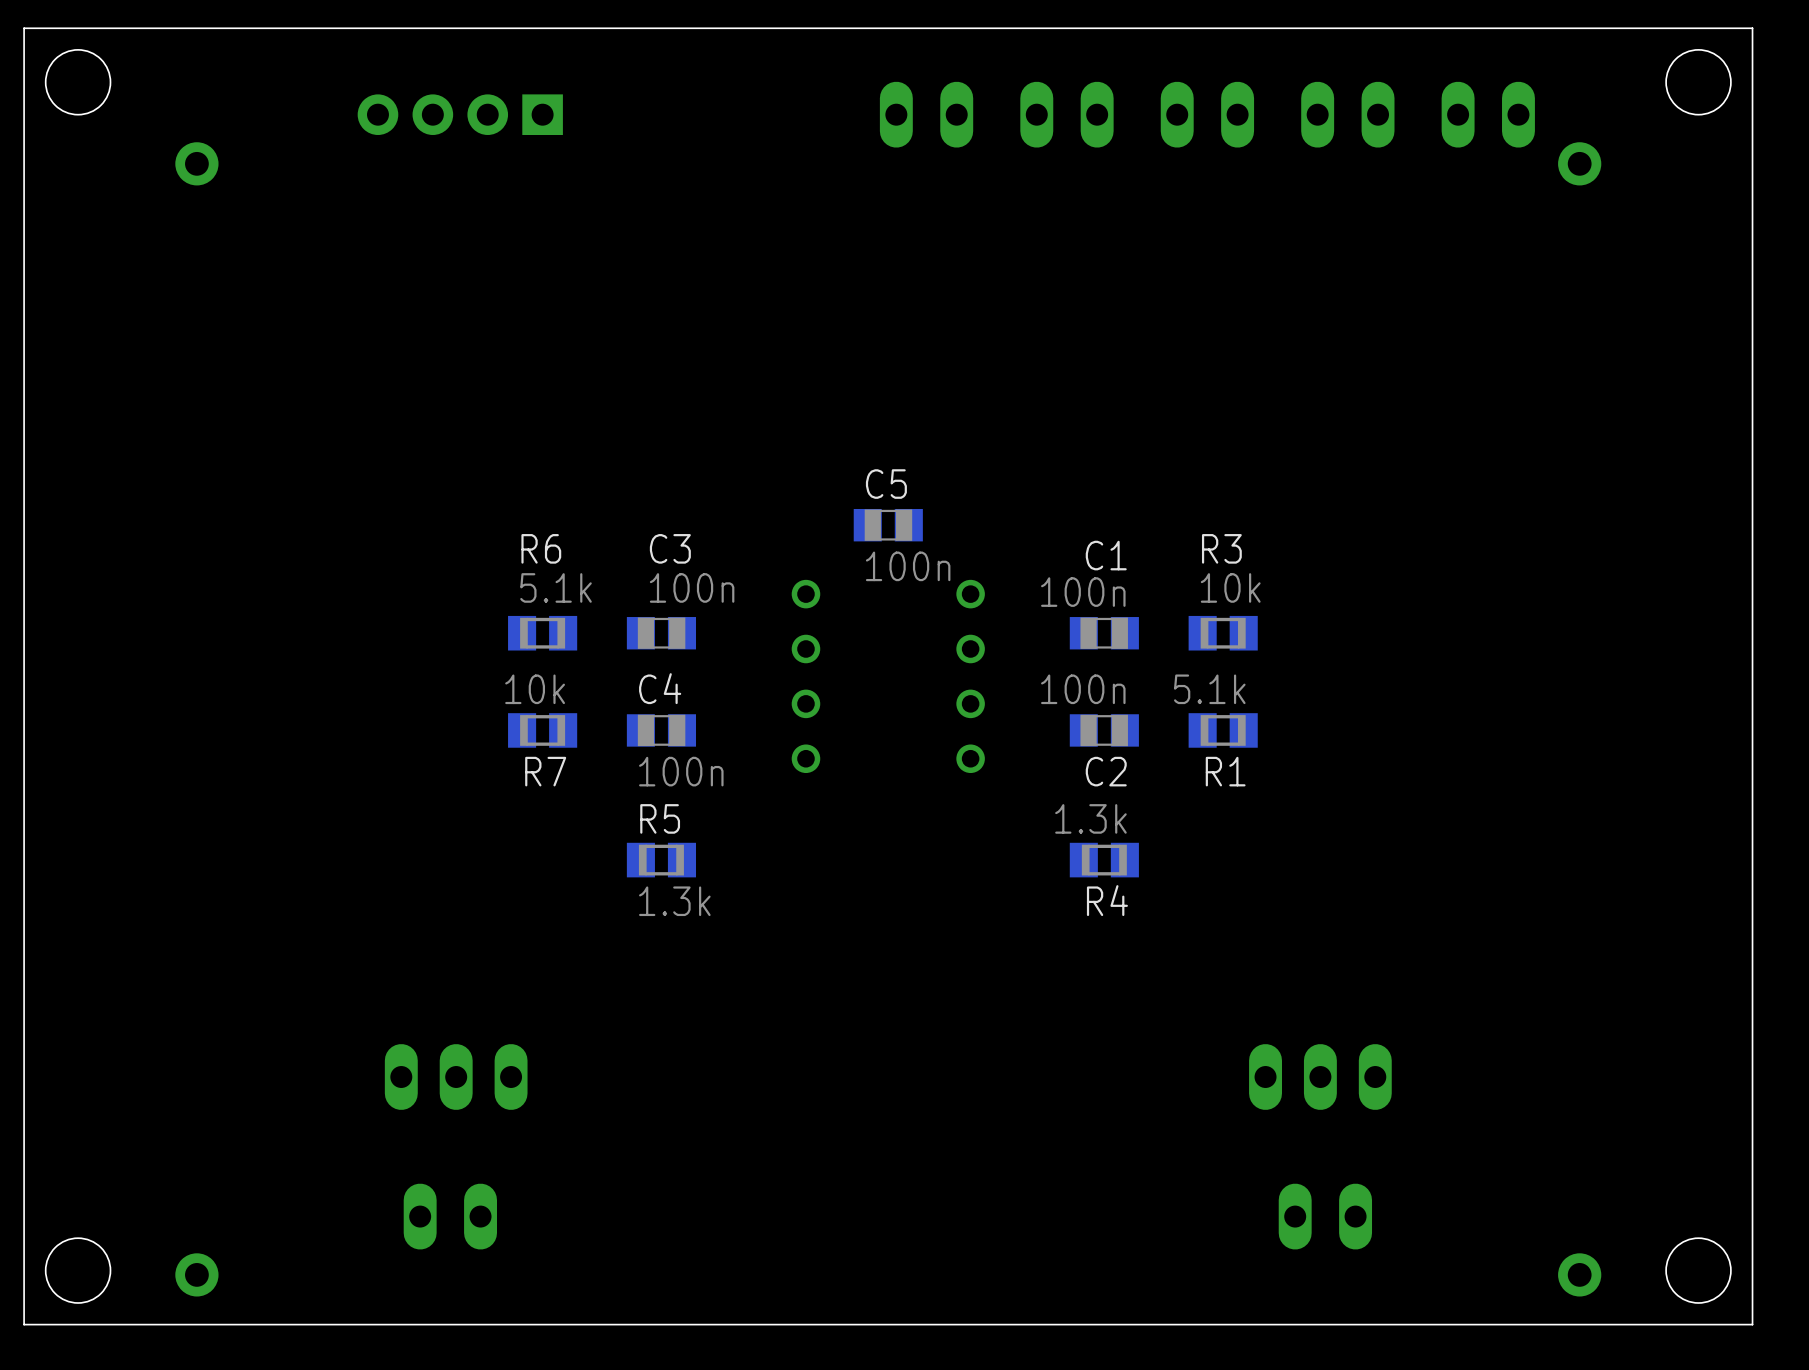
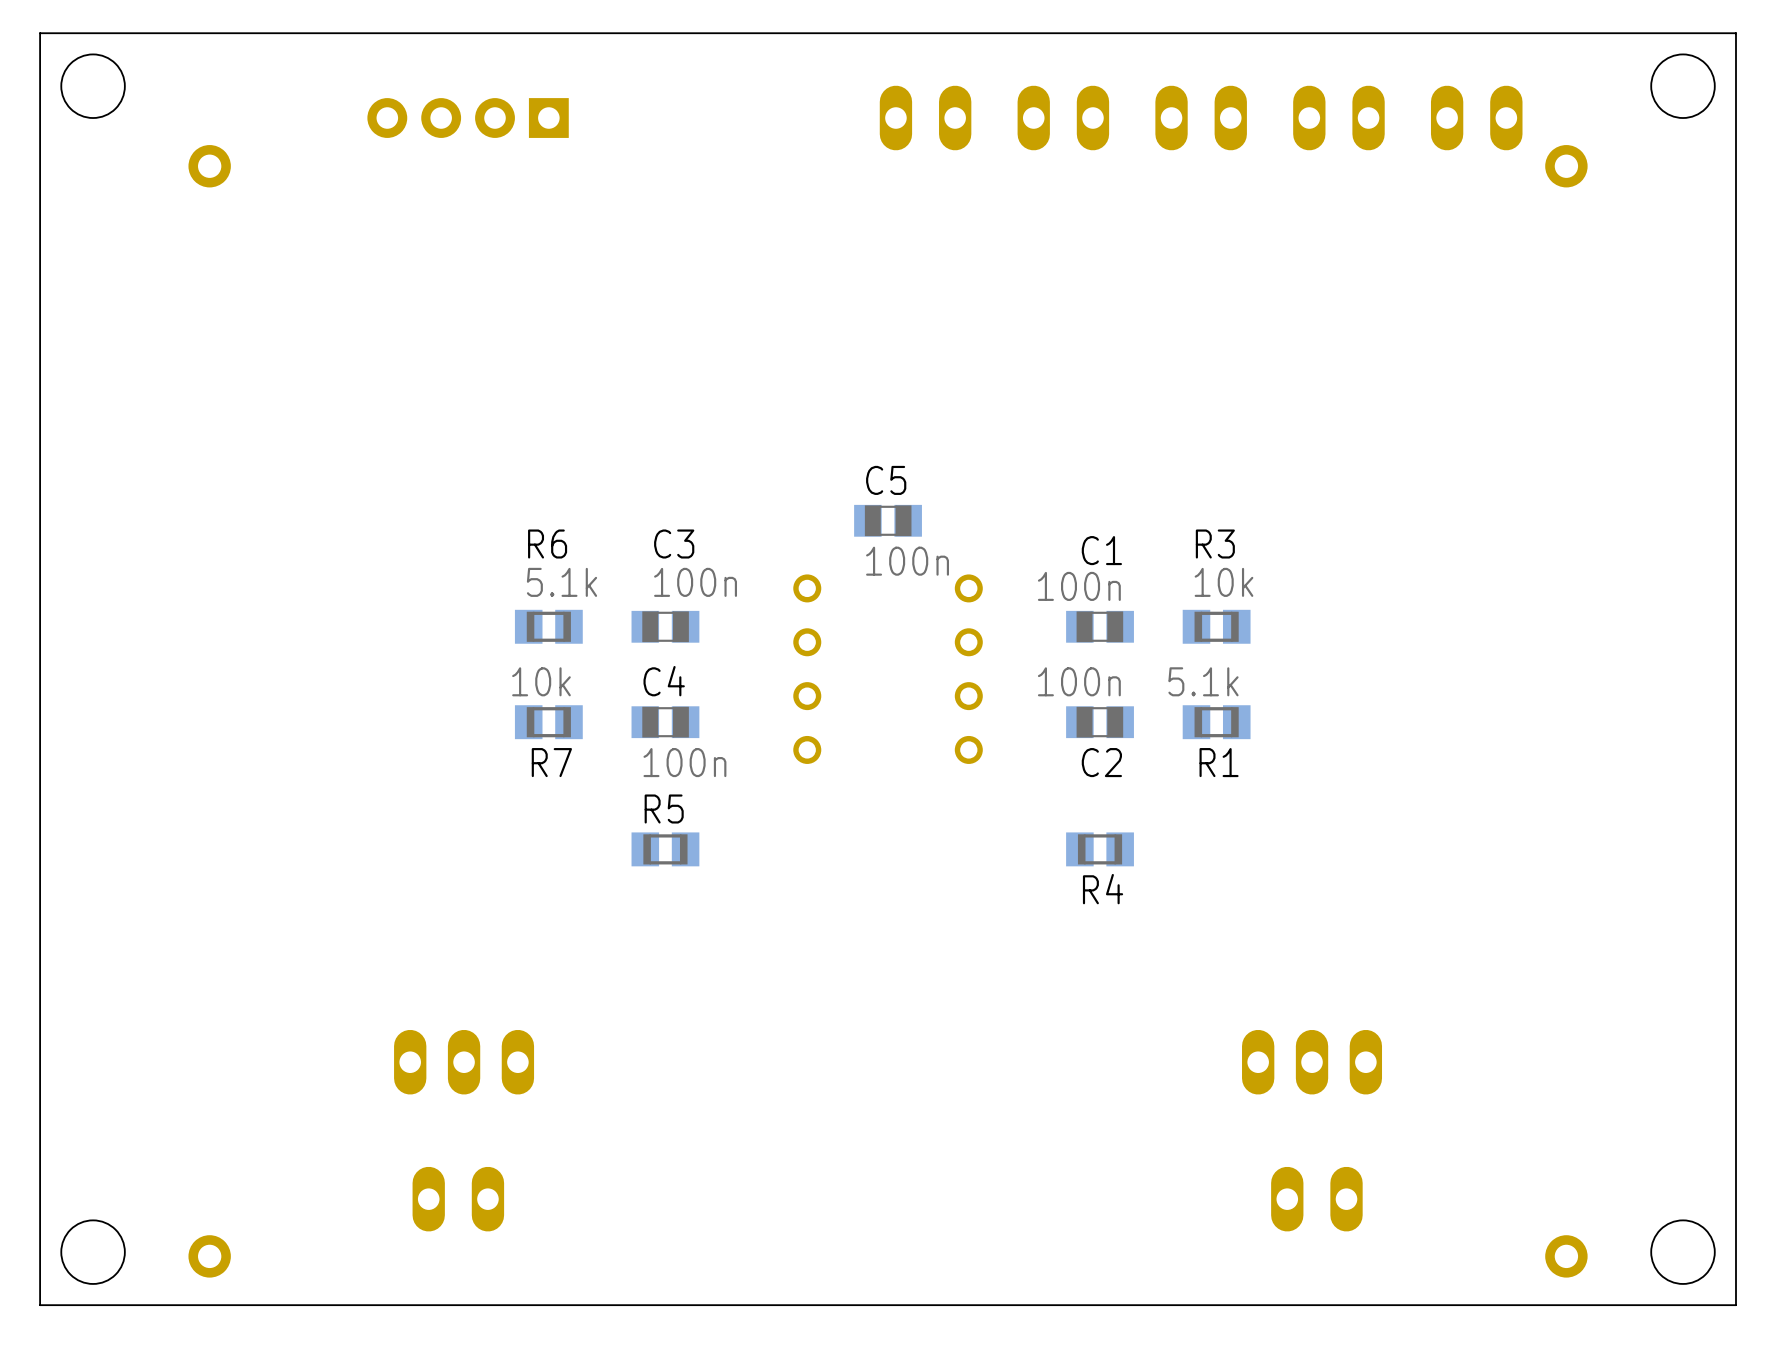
R4 value: 1.3k (1090, 818) -> none
R5 value: 1.3k (674, 901) -> none

